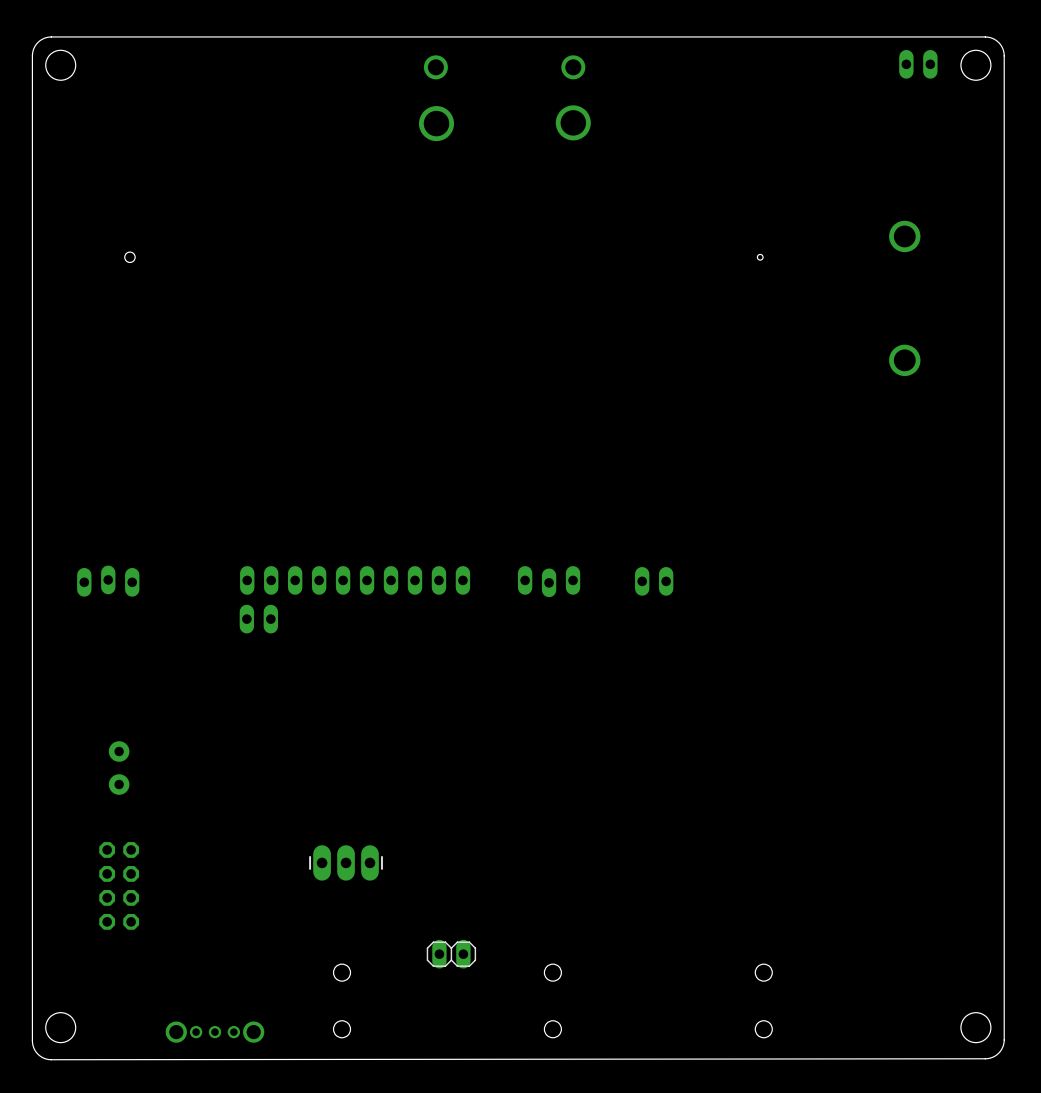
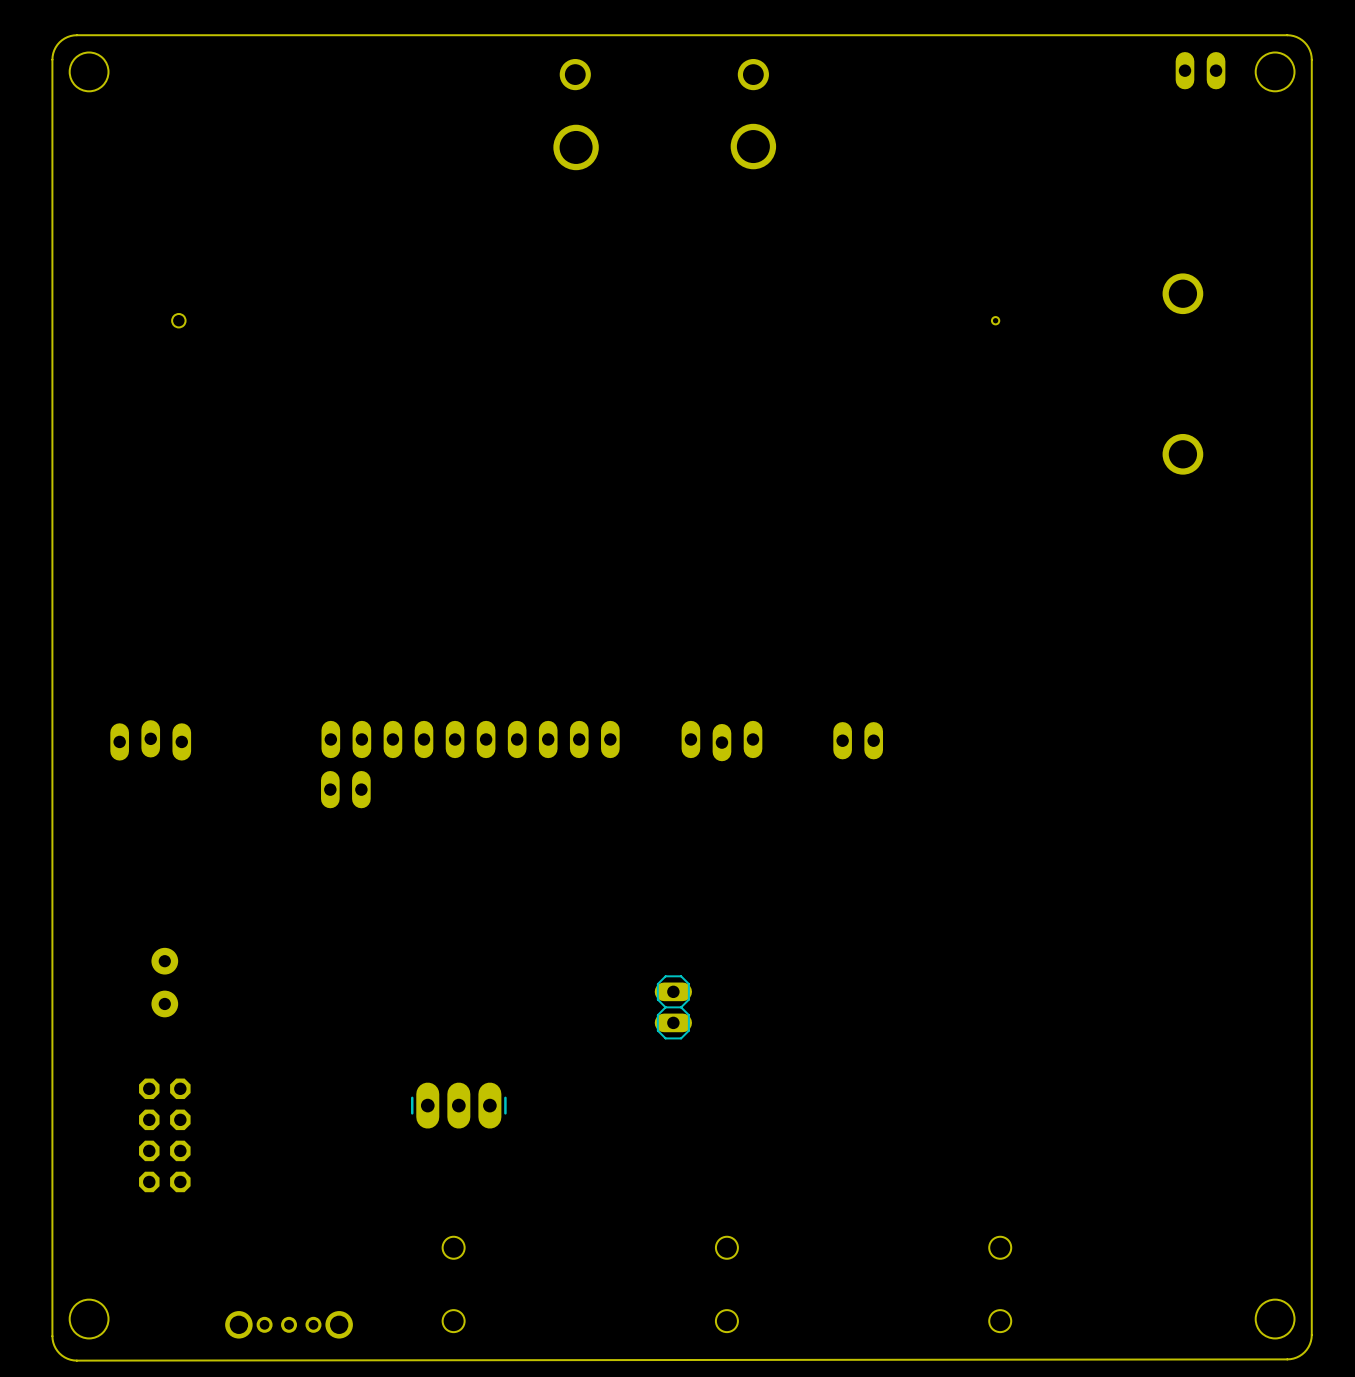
part rotation: 0° (451, 954) -> 90° clockwise (673, 1007)
part position: (451, 954) -> (673, 1007)

